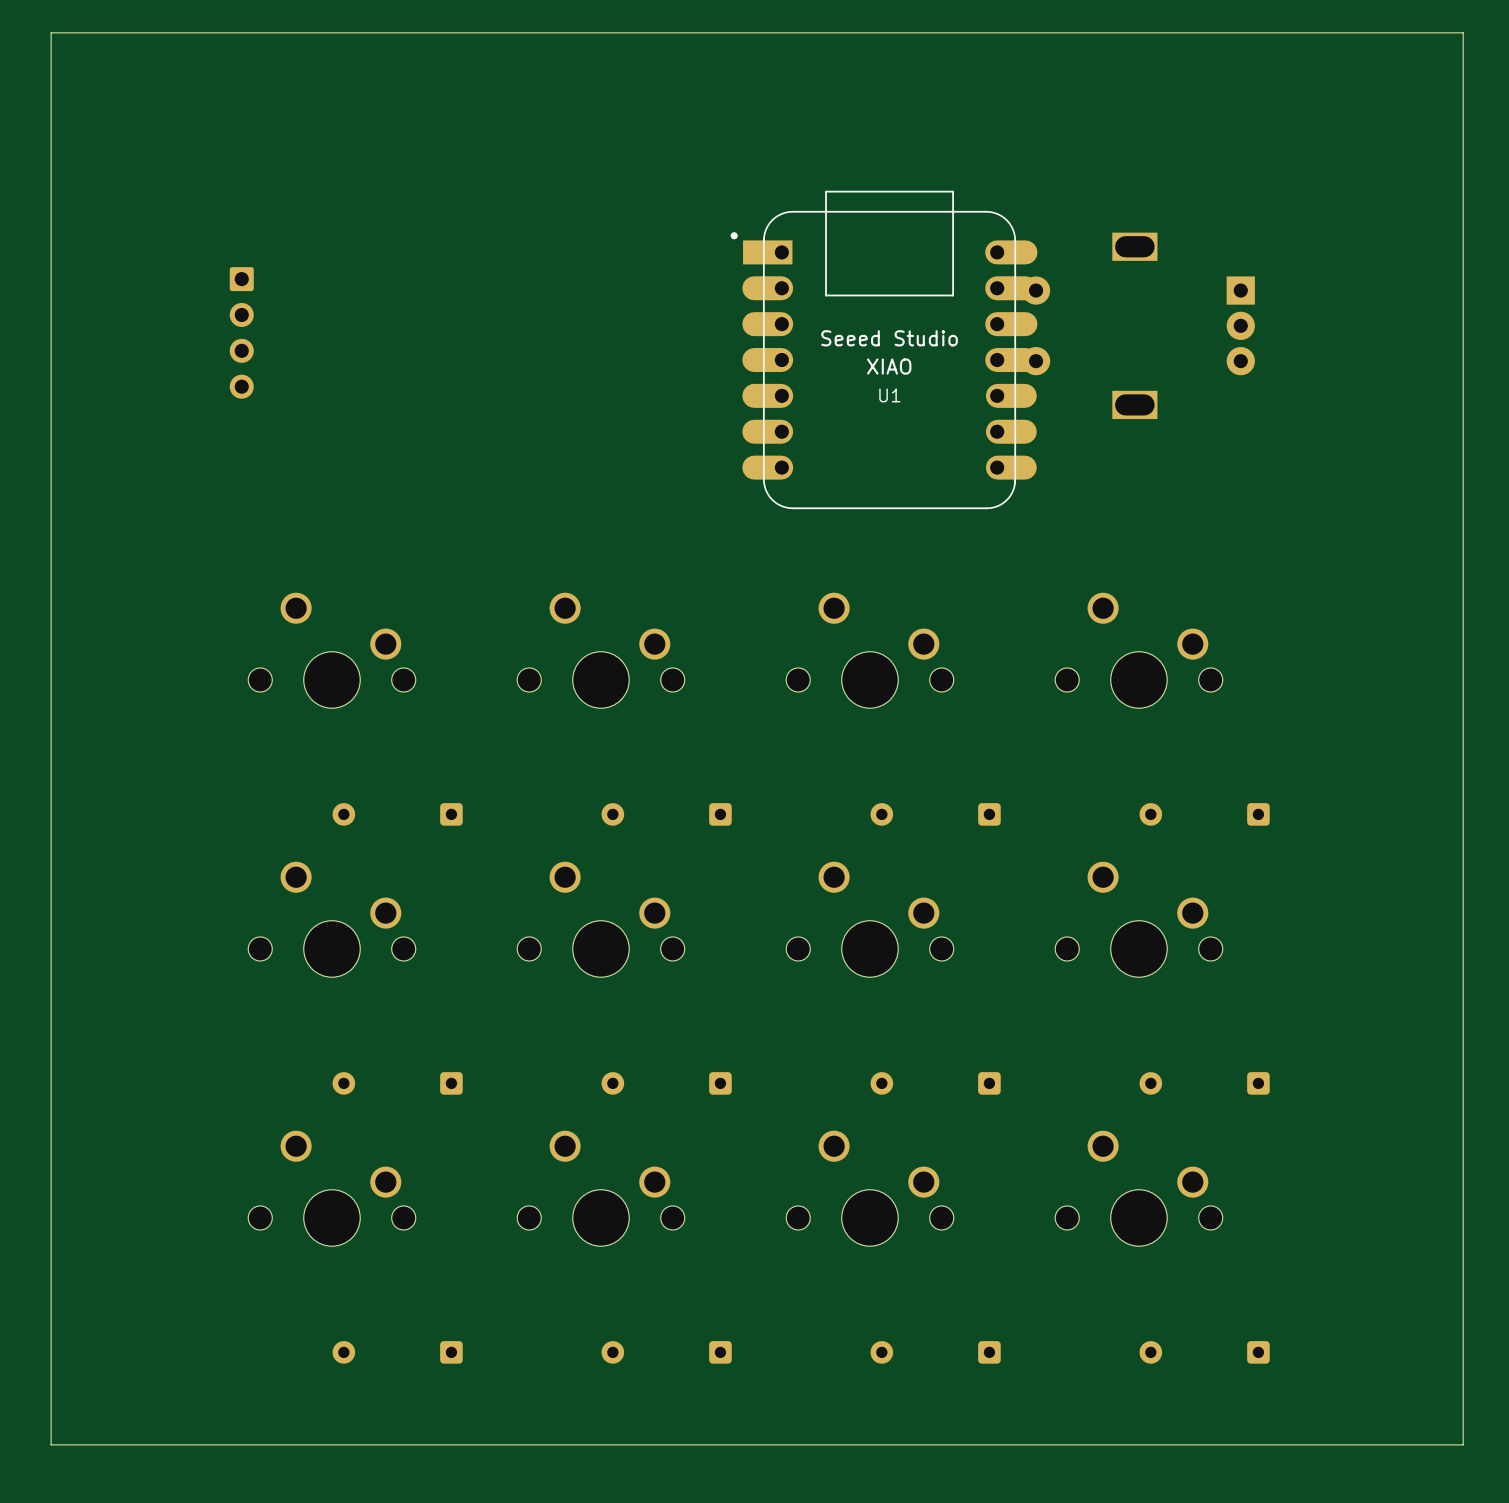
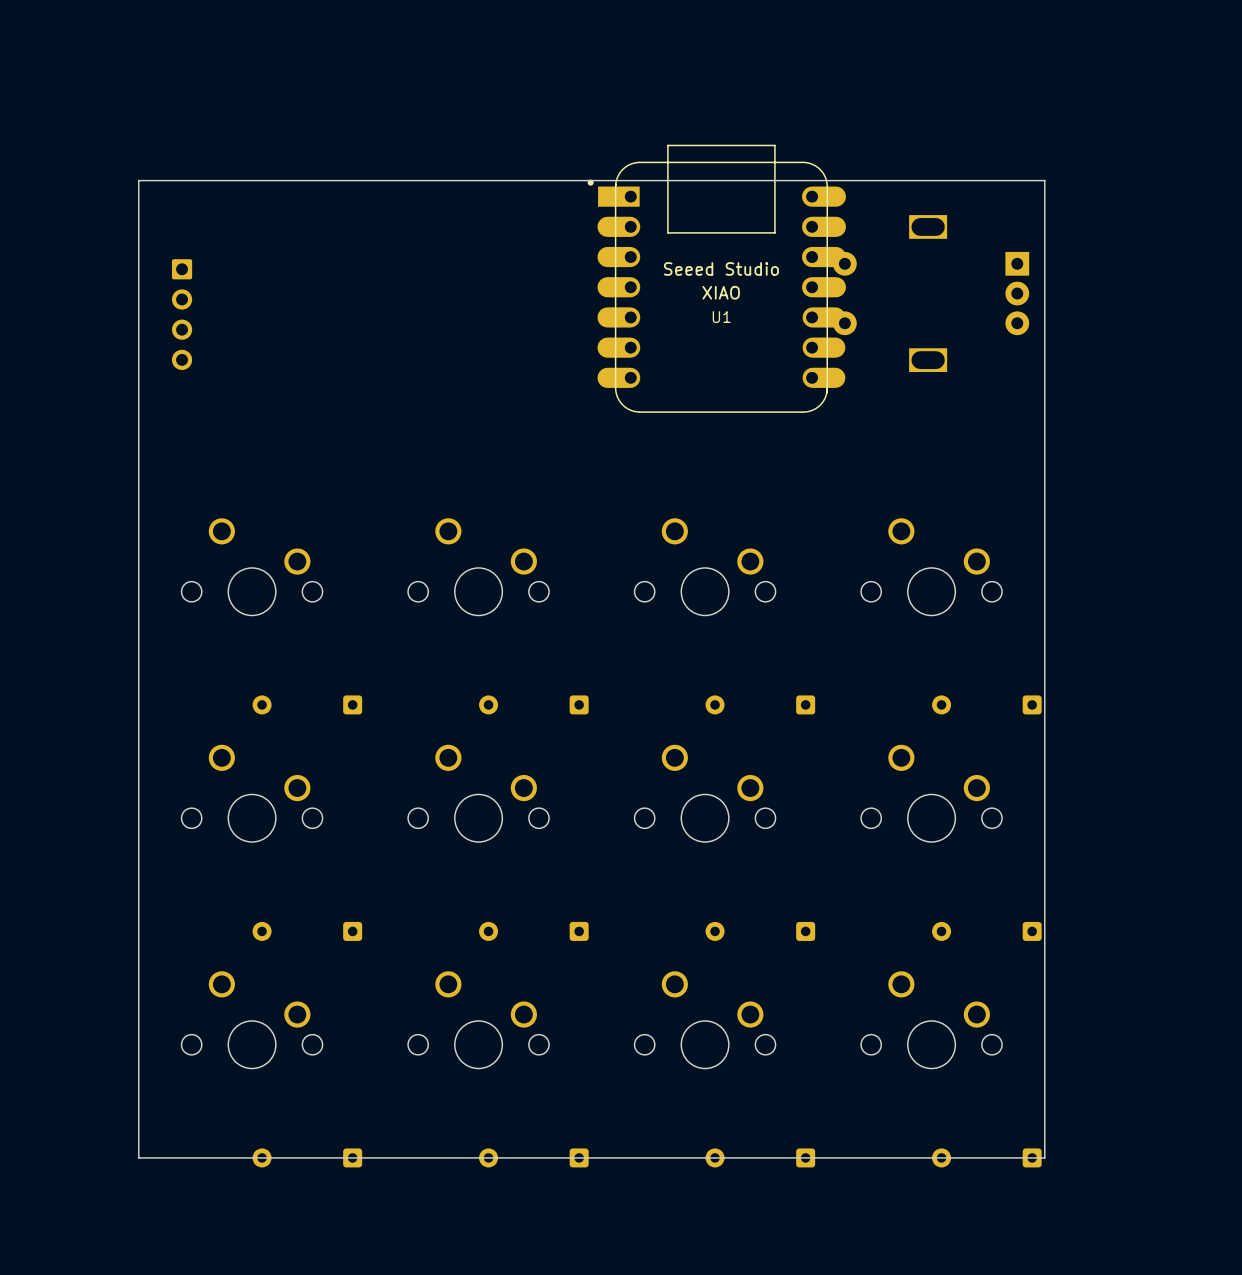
board edge: (1463, 32) (51, 32) (51, 1444) (1463, 1444) (1463, 32) -> (1044, 180) (1044, 1157) (138, 1157) (138, 180) (1044, 180)
part position: (241, 332) -> (182, 314)
U1 position: (884, 349) -> (716, 278)

